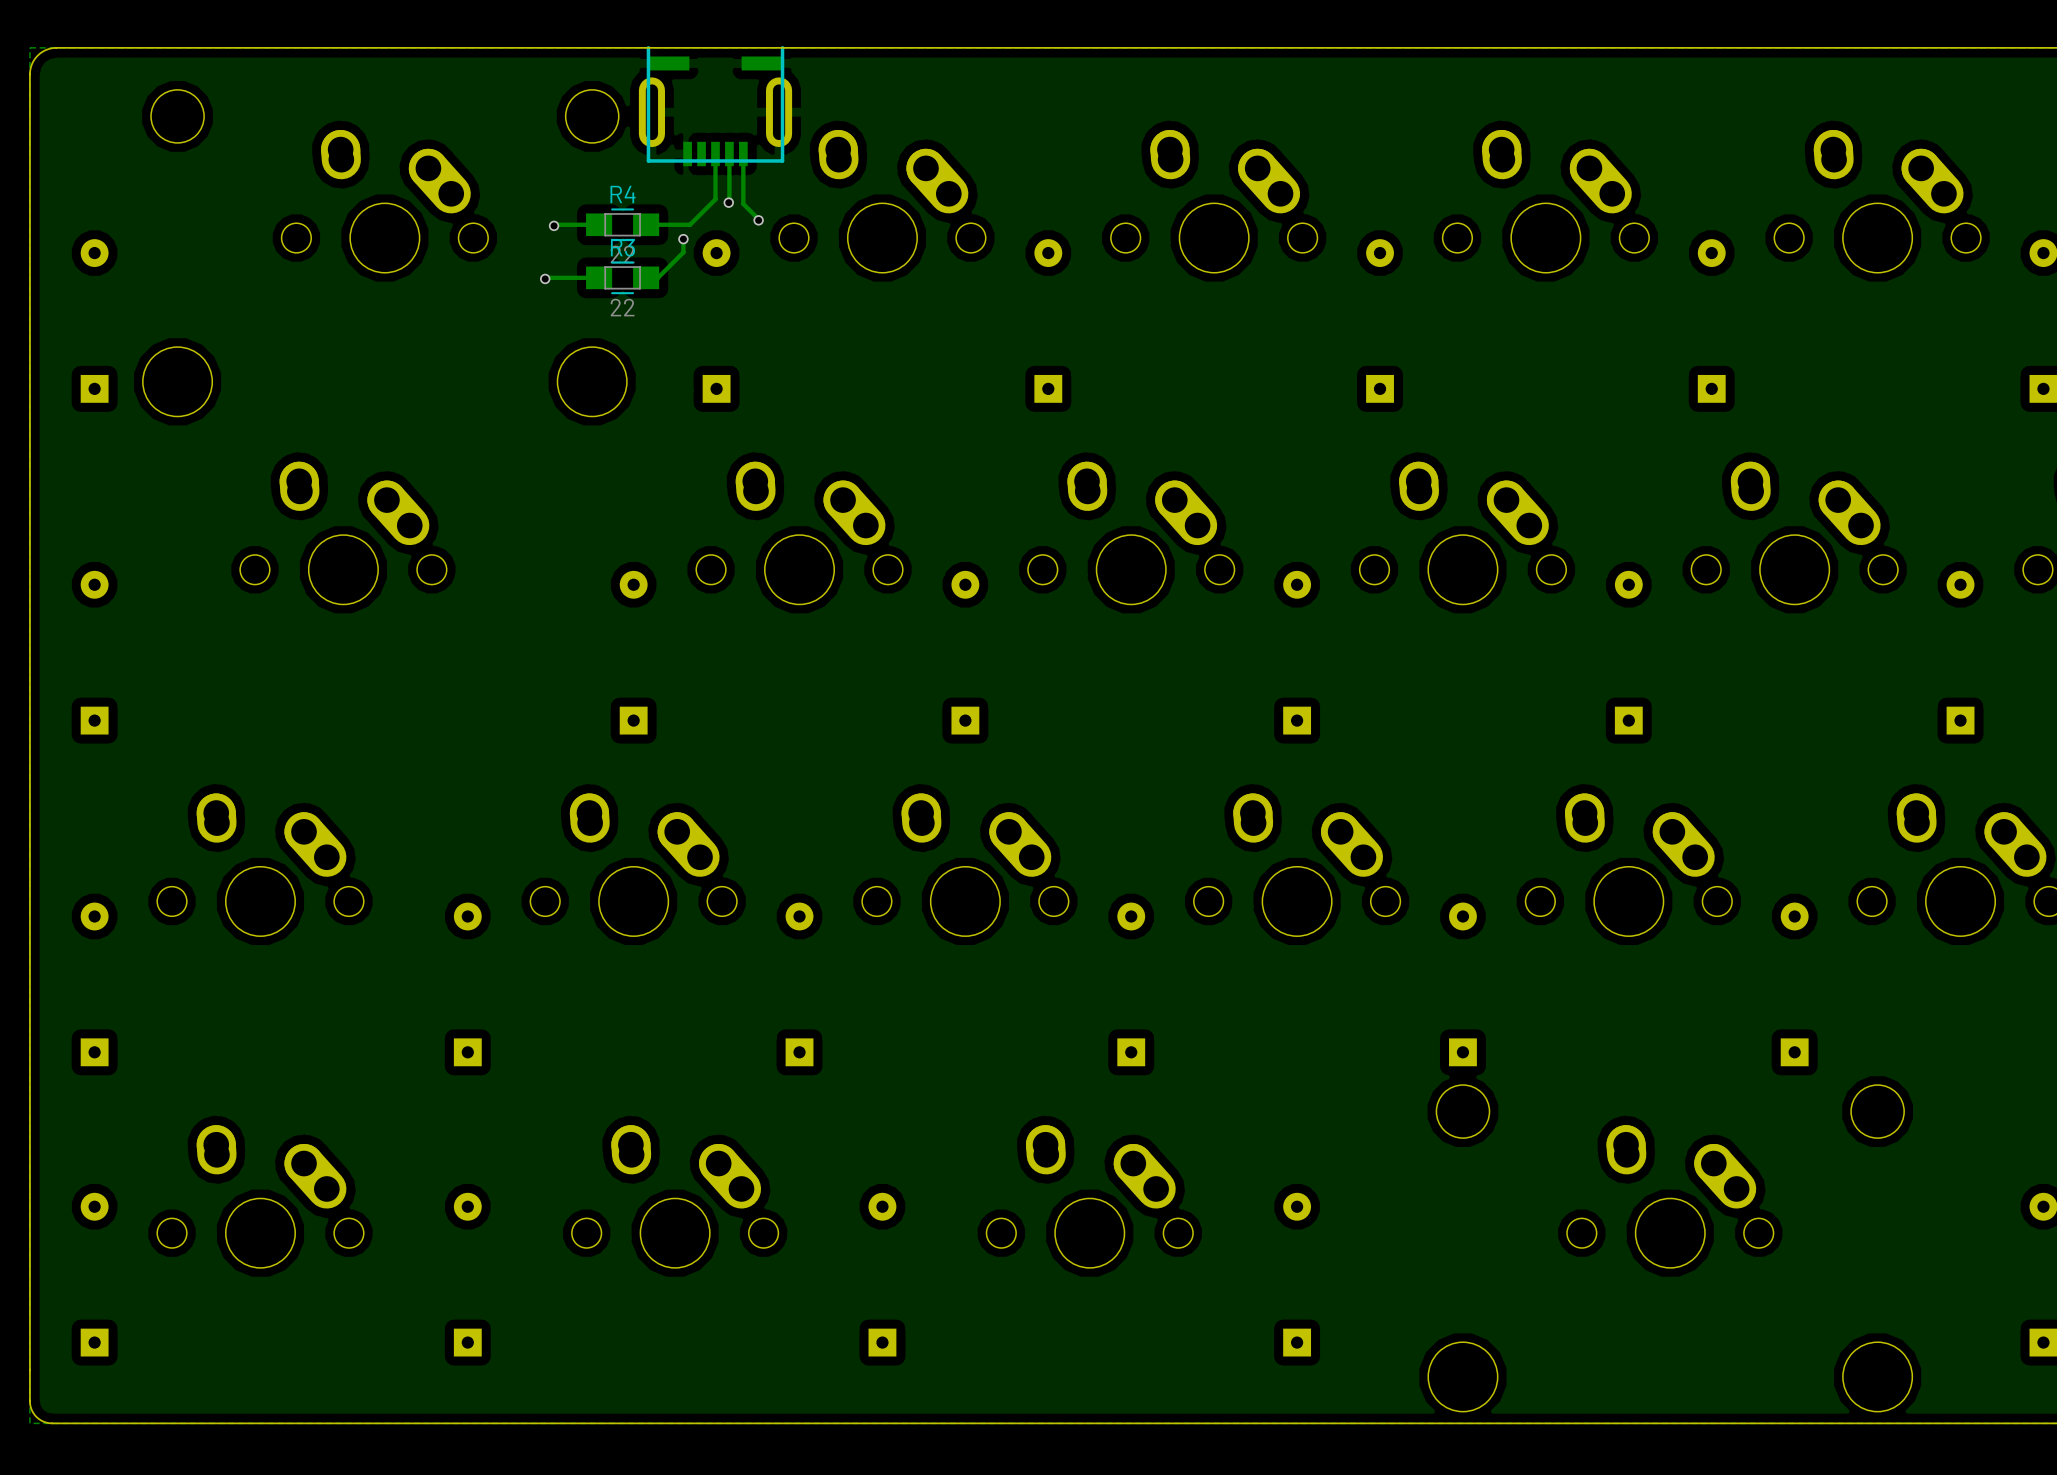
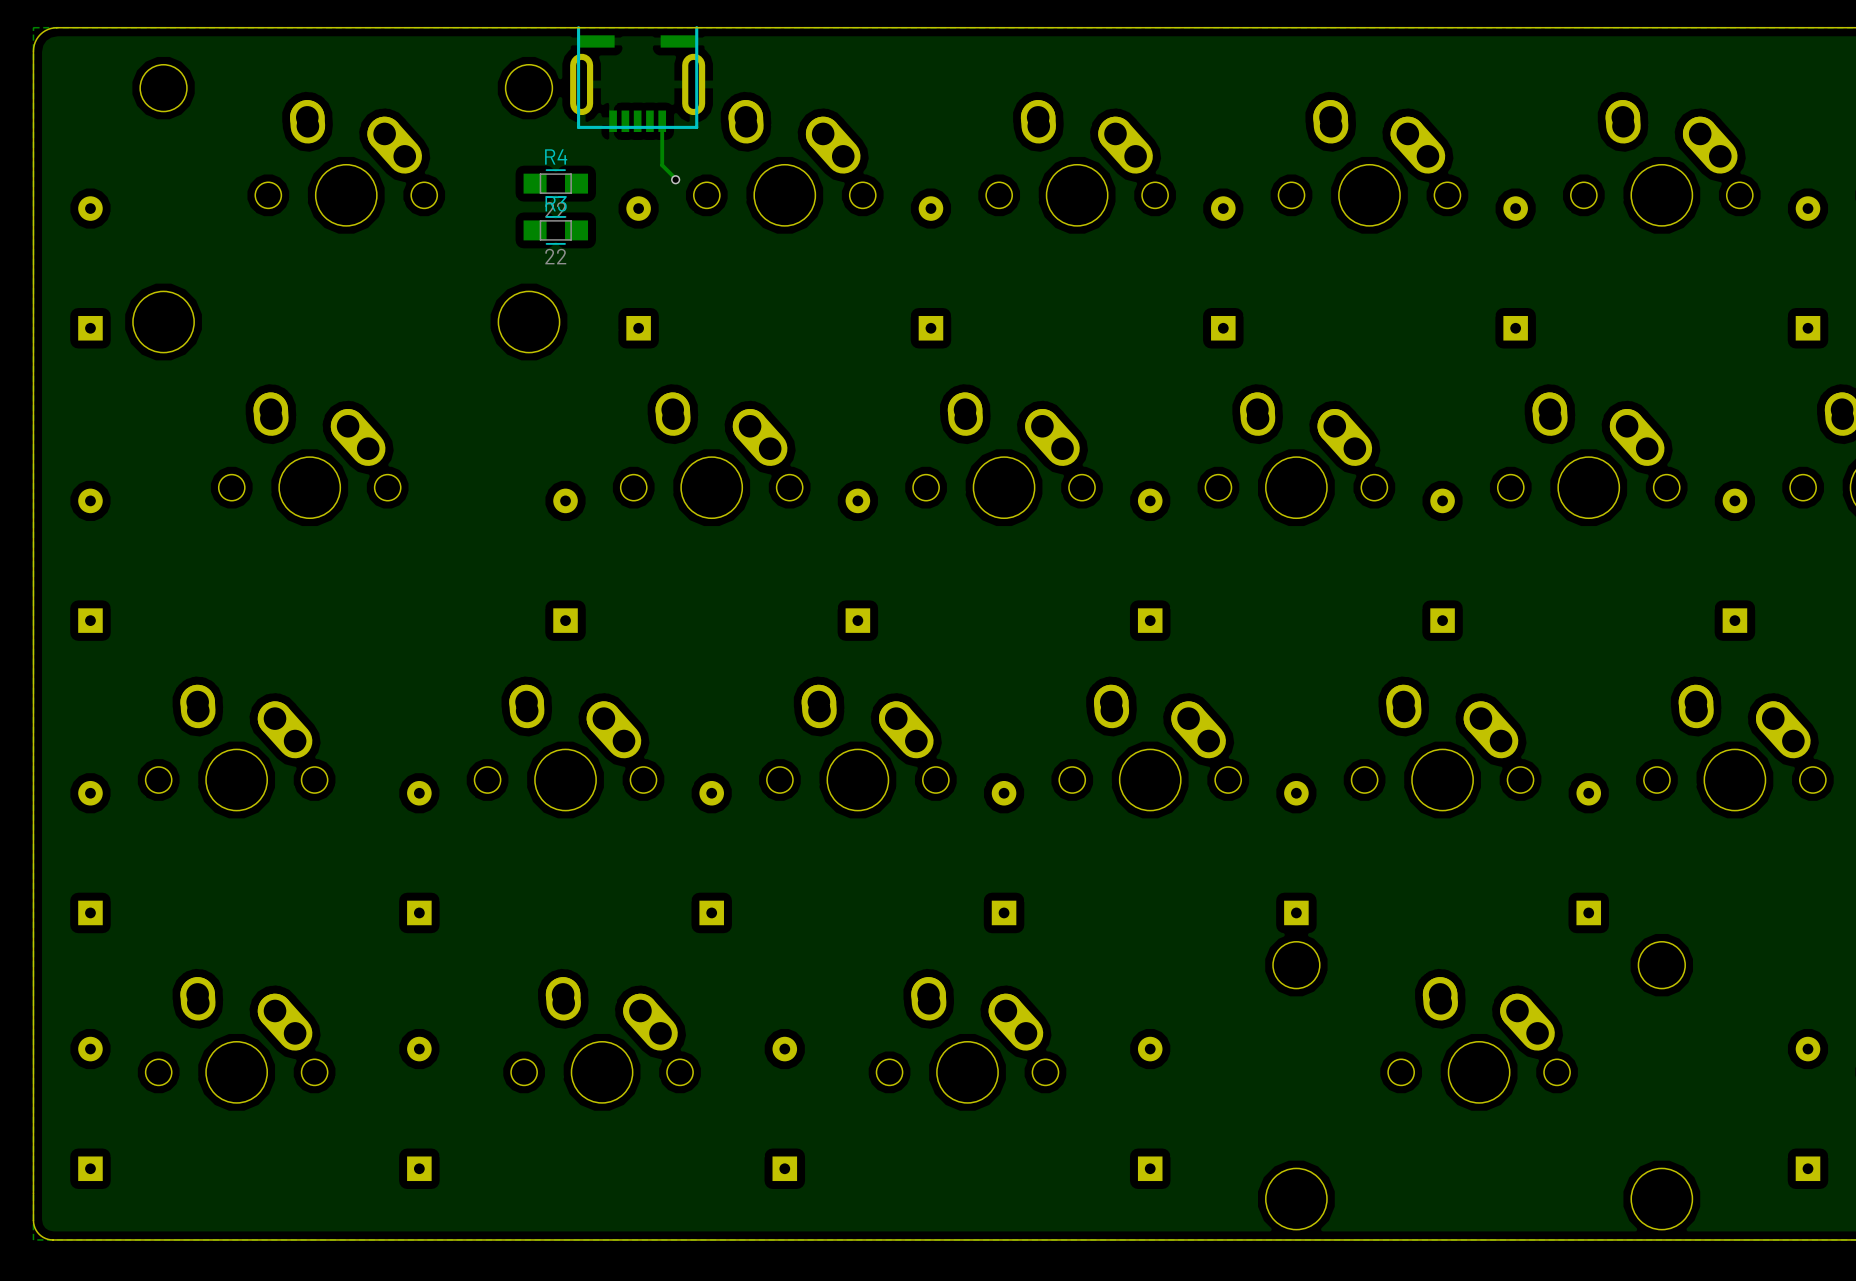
track: (715, 154) (715, 199) (690, 224) (646, 224) -> none
track: (729, 154) (728, 202) -> none
via: (728, 202) -> none
track: (599, 224) (554, 225) -> none
via: (554, 225) -> none
track: (683, 239) (683, 252) (657, 277) (646, 277) -> none
via: (683, 239) -> none
track: (599, 277) (545, 278) -> none
via: (545, 278) -> none

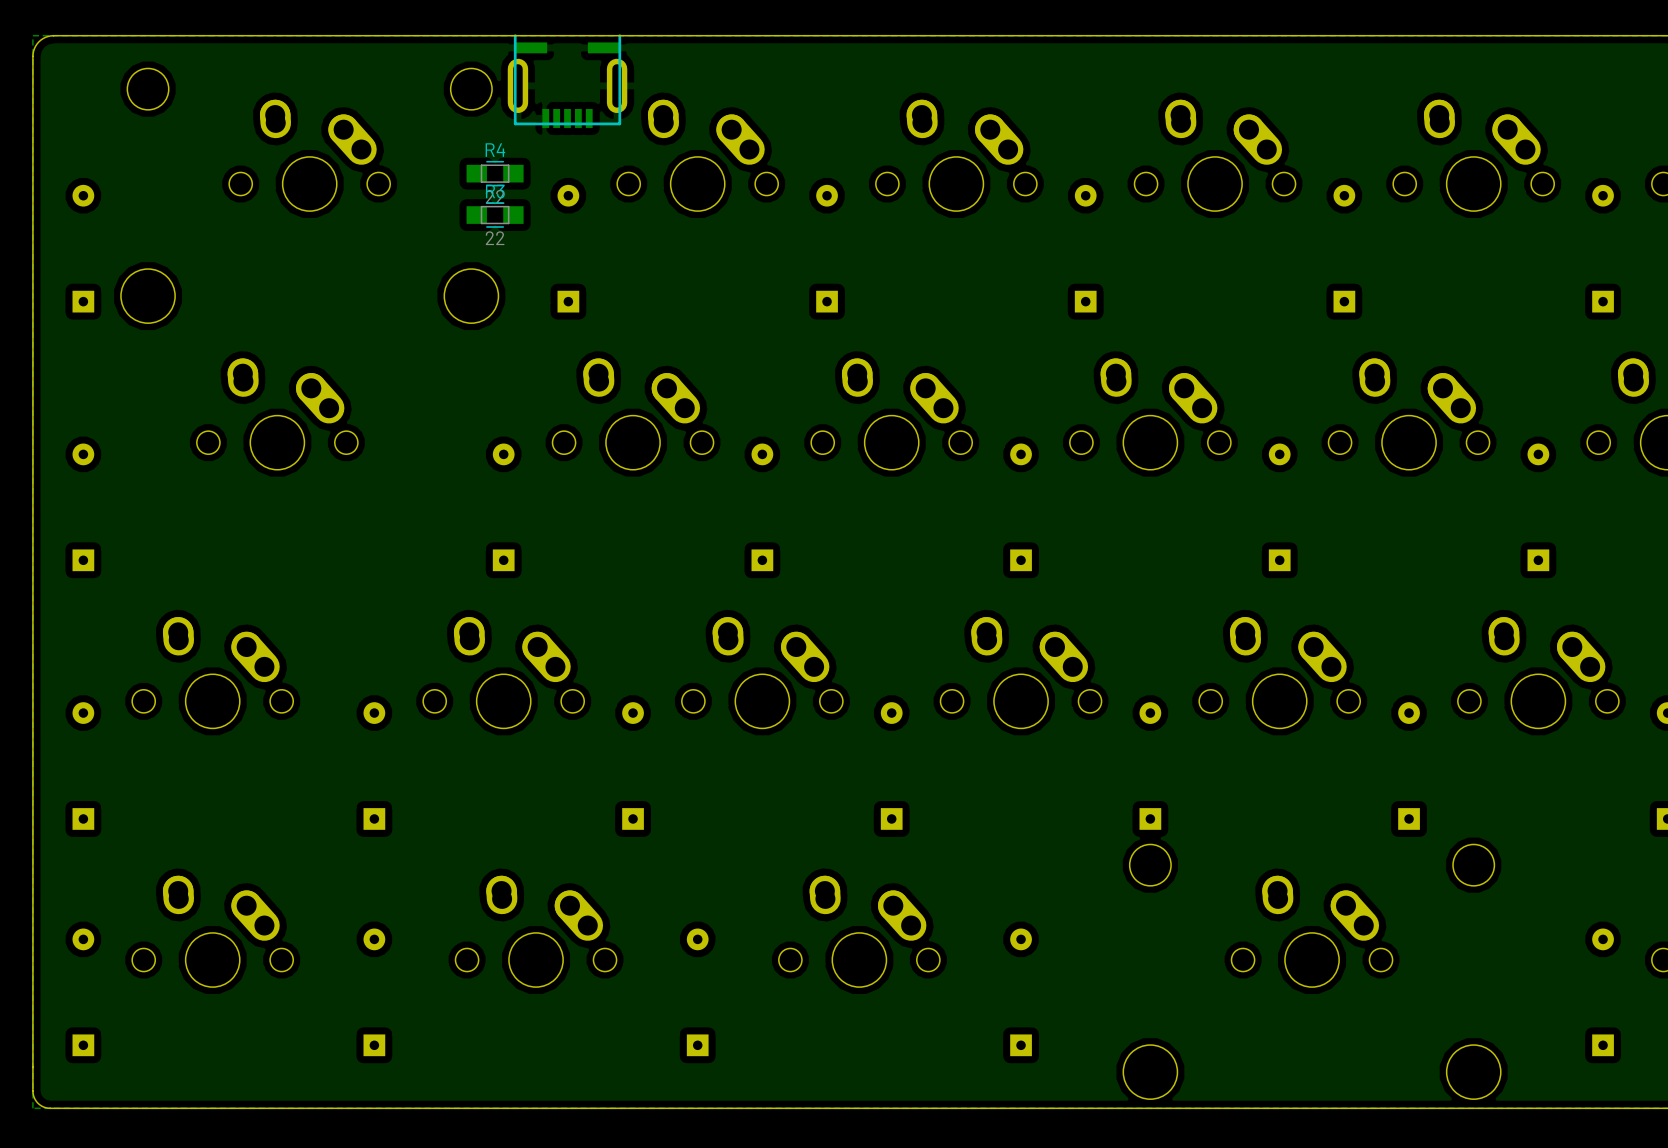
track: (662, 121) (662, 165) (675, 179) -> none
via: (675, 179) -> none

